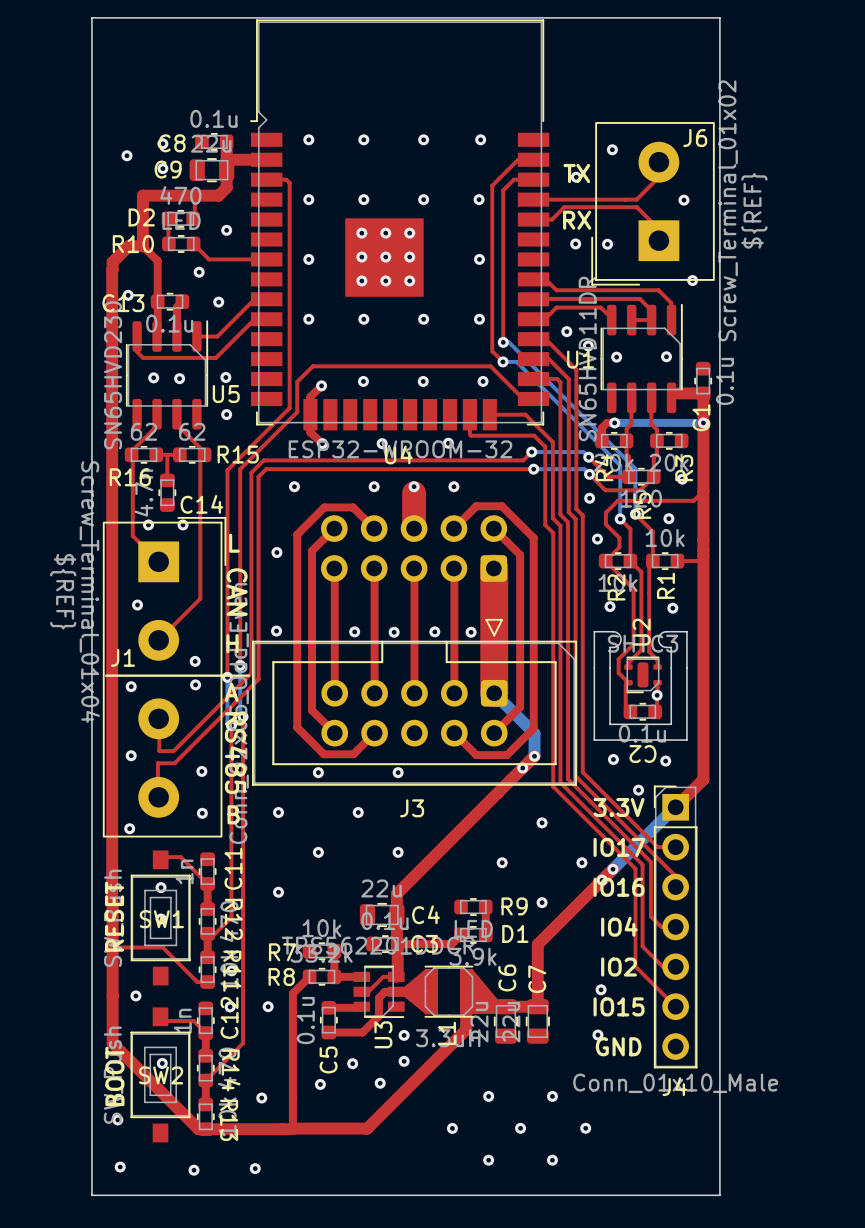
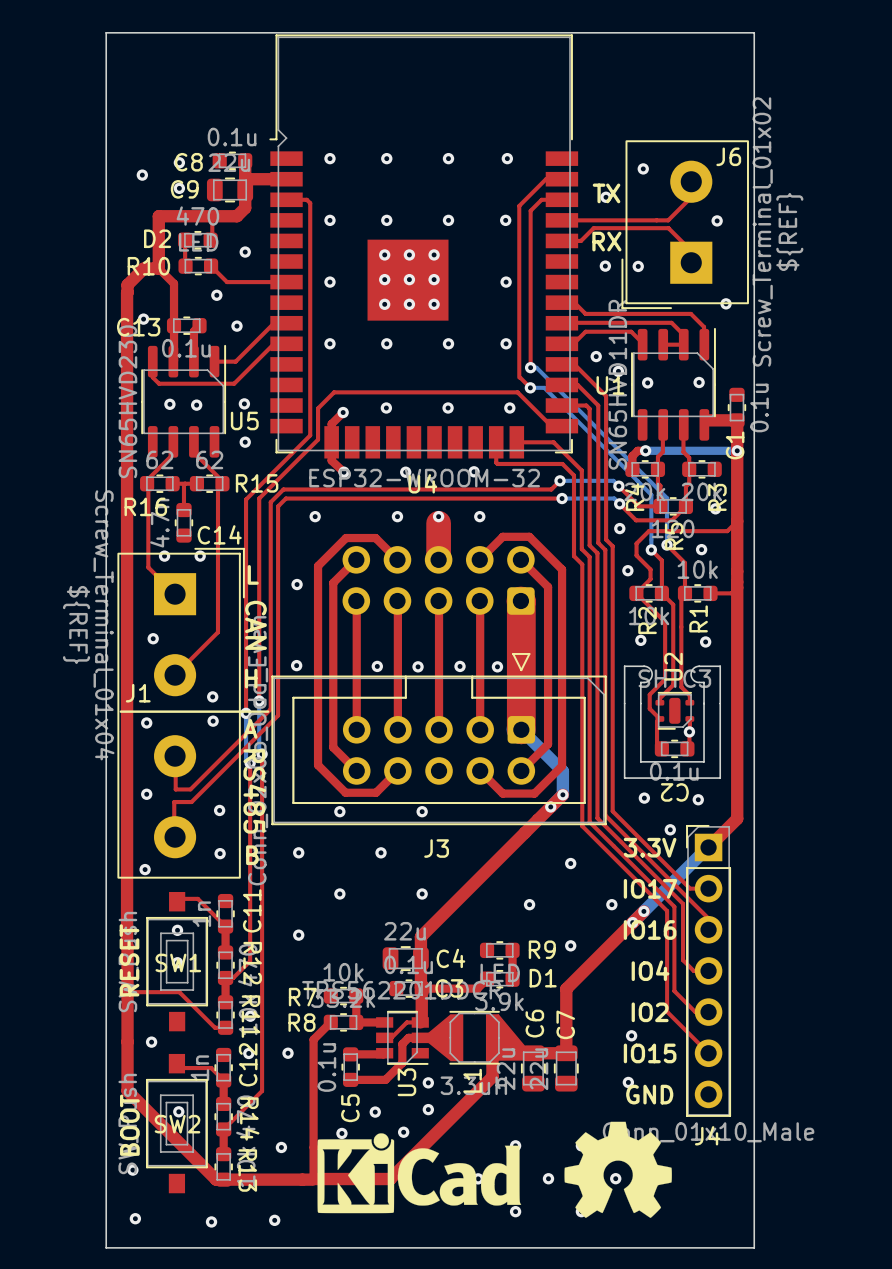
drawing: none -> [564, 1121, 672, 1218]
drawing: none -> [317, 1133, 522, 1214]

